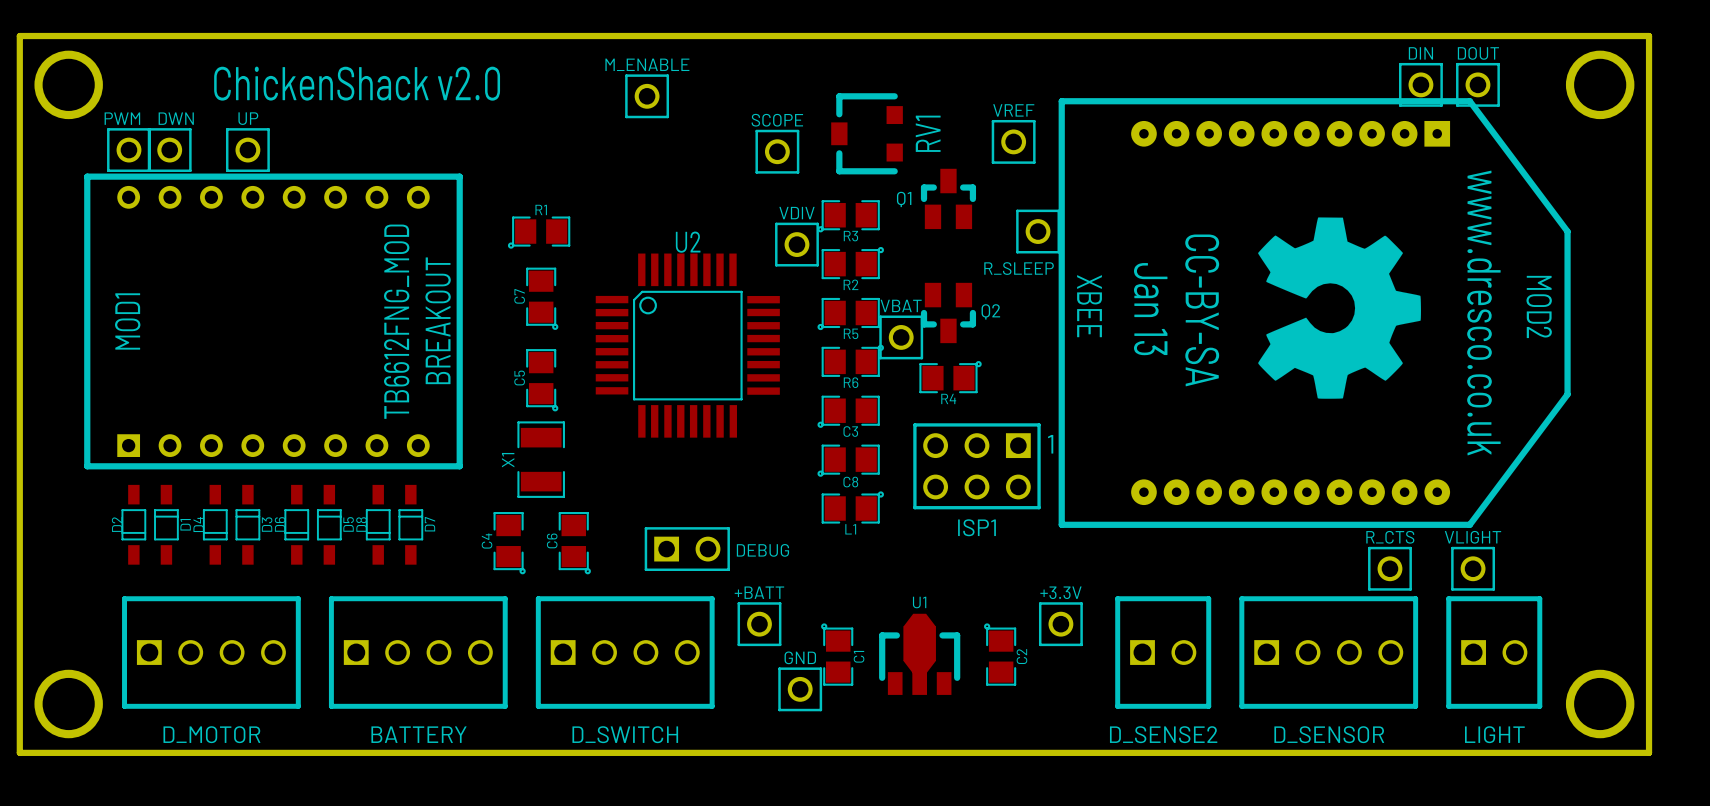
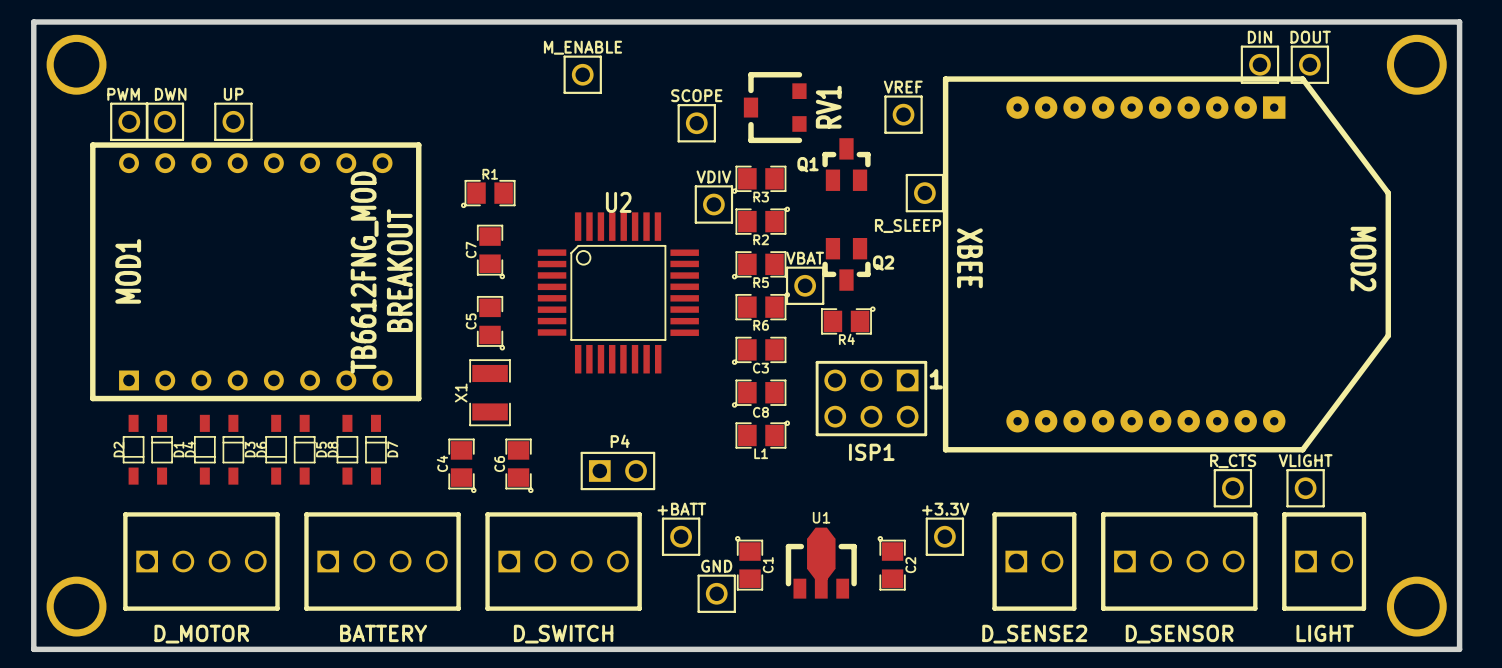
text: ChickenShack v2.0 (357, 83) -> none
drawing: [1258, 217, 1421, 399] -> none
text: Jan 13 (1150, 309) -> none
text: CC-BY-SA (1202, 310) -> none
text: www.dresco.co.uk (1483, 313) -> none
DEBUG name: DEBUG (762, 550) -> P4 (620, 441)

